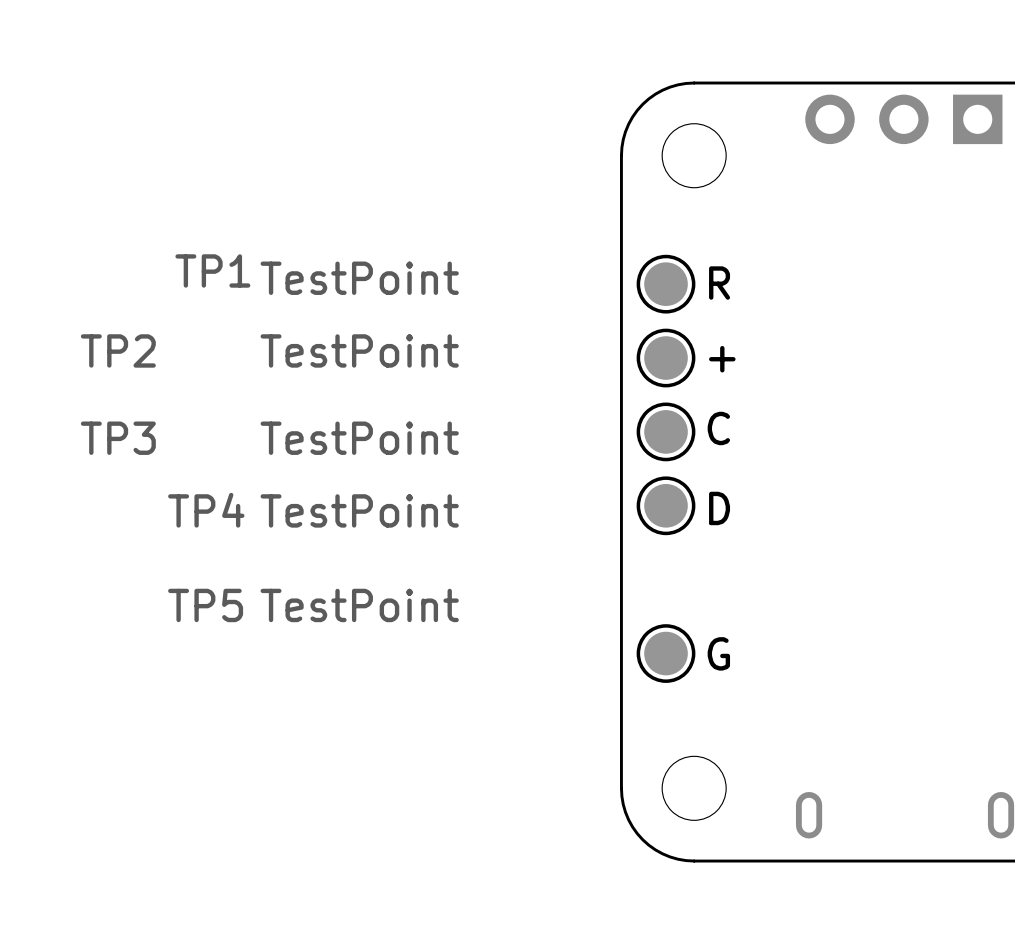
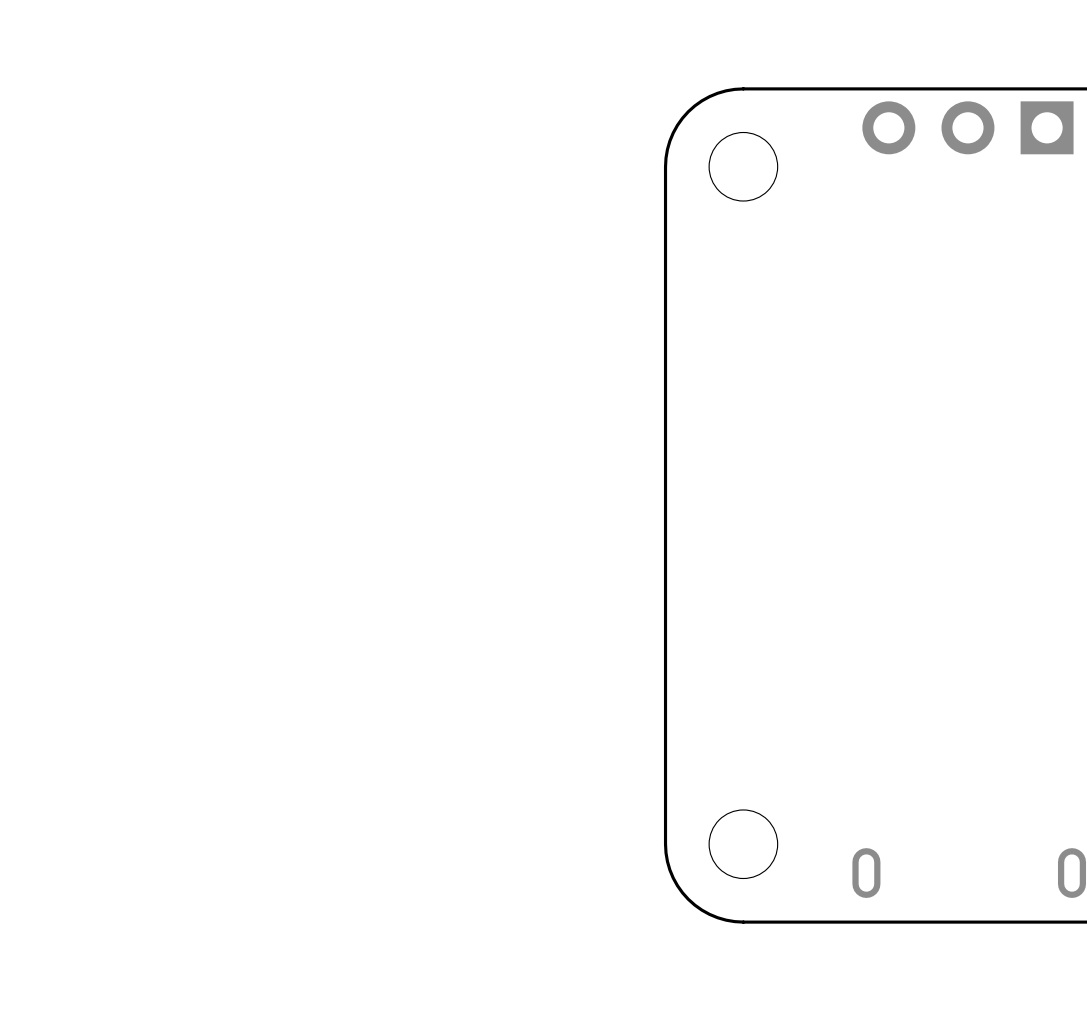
text: R (719, 283) -> none
TP1: TestPoint (666, 284) -> none
TP2: TestPoint (666, 358) -> none
text: + (722, 359) -> none
text: C (718, 428) -> none
TP3: TestPoint (666, 431) -> none
TP4: TestPoint (666, 505) -> none
text: D (719, 508) -> none
TP5: TestPoint (666, 653) -> none
text: G (718, 653) -> none

